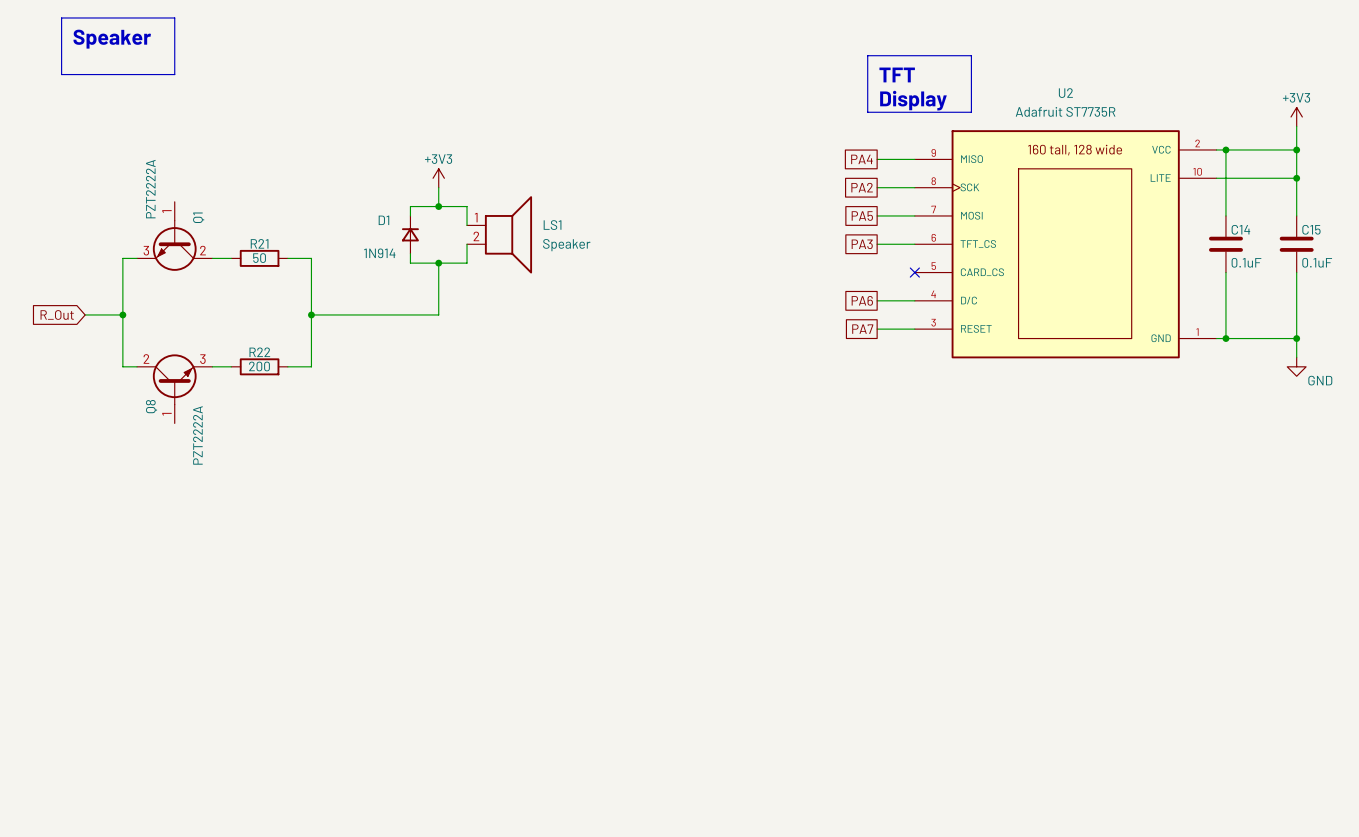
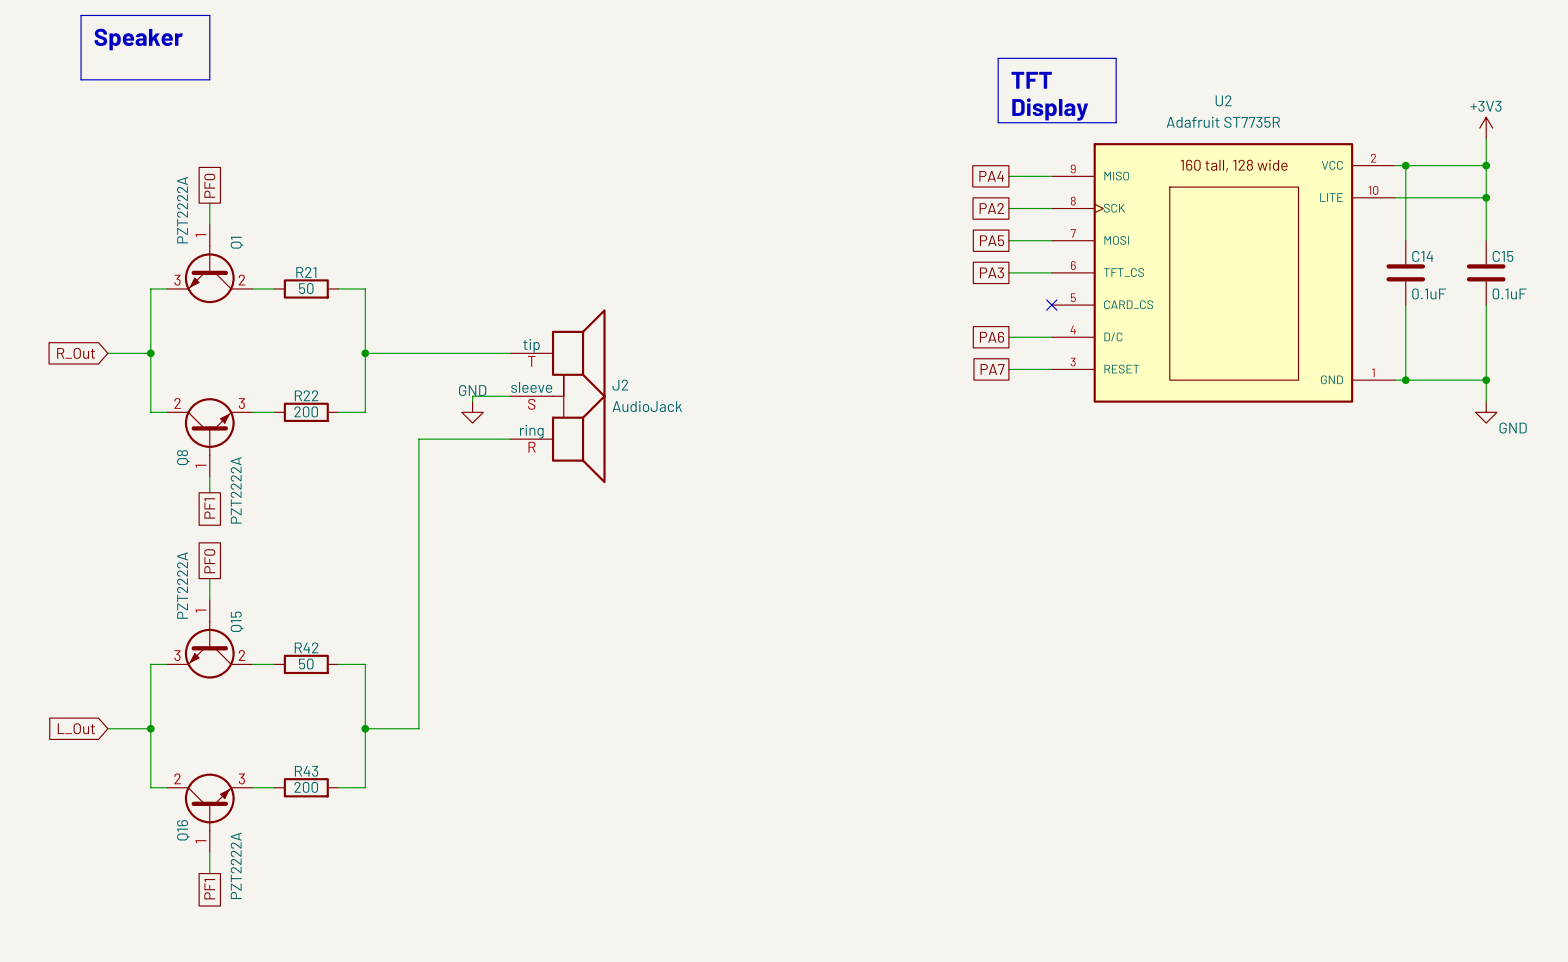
global label: none -> PF0 (209, 185)
power symbol: +3V3 (438, 178) -> none
wire: none -> (209, 203) (209, 224)
wire: (438, 187) (438, 206) -> none
junction: (438, 206) -> none
wire: (410, 215) (410, 206) (467, 206) (467, 225) -> none
D1: 1N914 (410, 234) -> none
LS1: Speaker (499, 234) -> none
wire: (467, 244) (467, 263) (410, 263) (410, 253) -> none
wire: (438, 263) (438, 314) -> none
junction: (438, 263) -> none
wire: none -> (510, 396) (472, 396) (472, 401)
J2: none -> AudioJack (557, 396)
power symbol: none -> GND (472, 412)
wire: none -> (510, 439) (418, 439) (418, 728) (365, 728)
wire: none -> (209, 476) (209, 492)
global label: none -> PF1 (209, 508)
global label: none -> PF0 (209, 561)
wire: none -> (209, 578) (209, 600)
Q15: none -> PZT2222A (209, 639)
wire: none -> (166, 664) (150, 664) (150, 787) (166, 787)
wire: none -> (252, 664) (274, 664)
R42: none -> 50 (306, 664)
wire: none -> (338, 664) (365, 664) (365, 787) (338, 787)
global label: none -> L_Out (76, 728)
wire: none -> (107, 728) (150, 728)
junction: none -> (150, 728)
junction: none -> (365, 728)
wire: none -> (252, 787) (274, 787)
R43: none -> 200 (306, 787)
Q16: none -> PZT2222A (209, 812)
wire: none -> (209, 852) (209, 873)
global label: none -> PF1 (209, 889)

